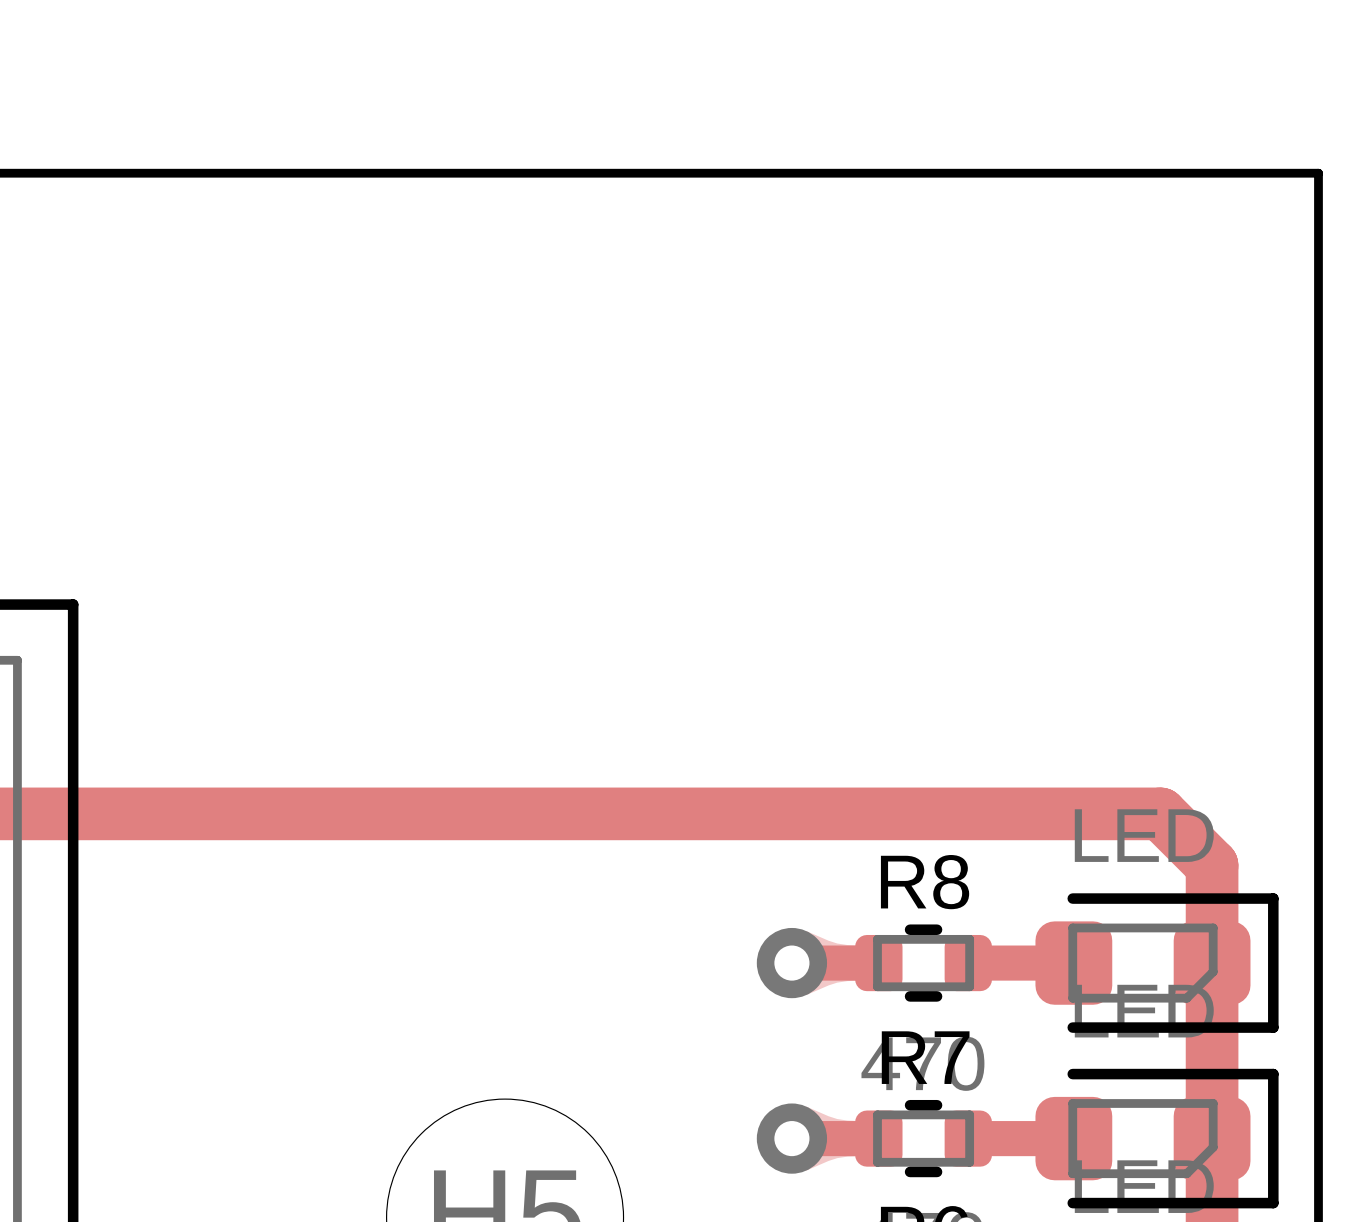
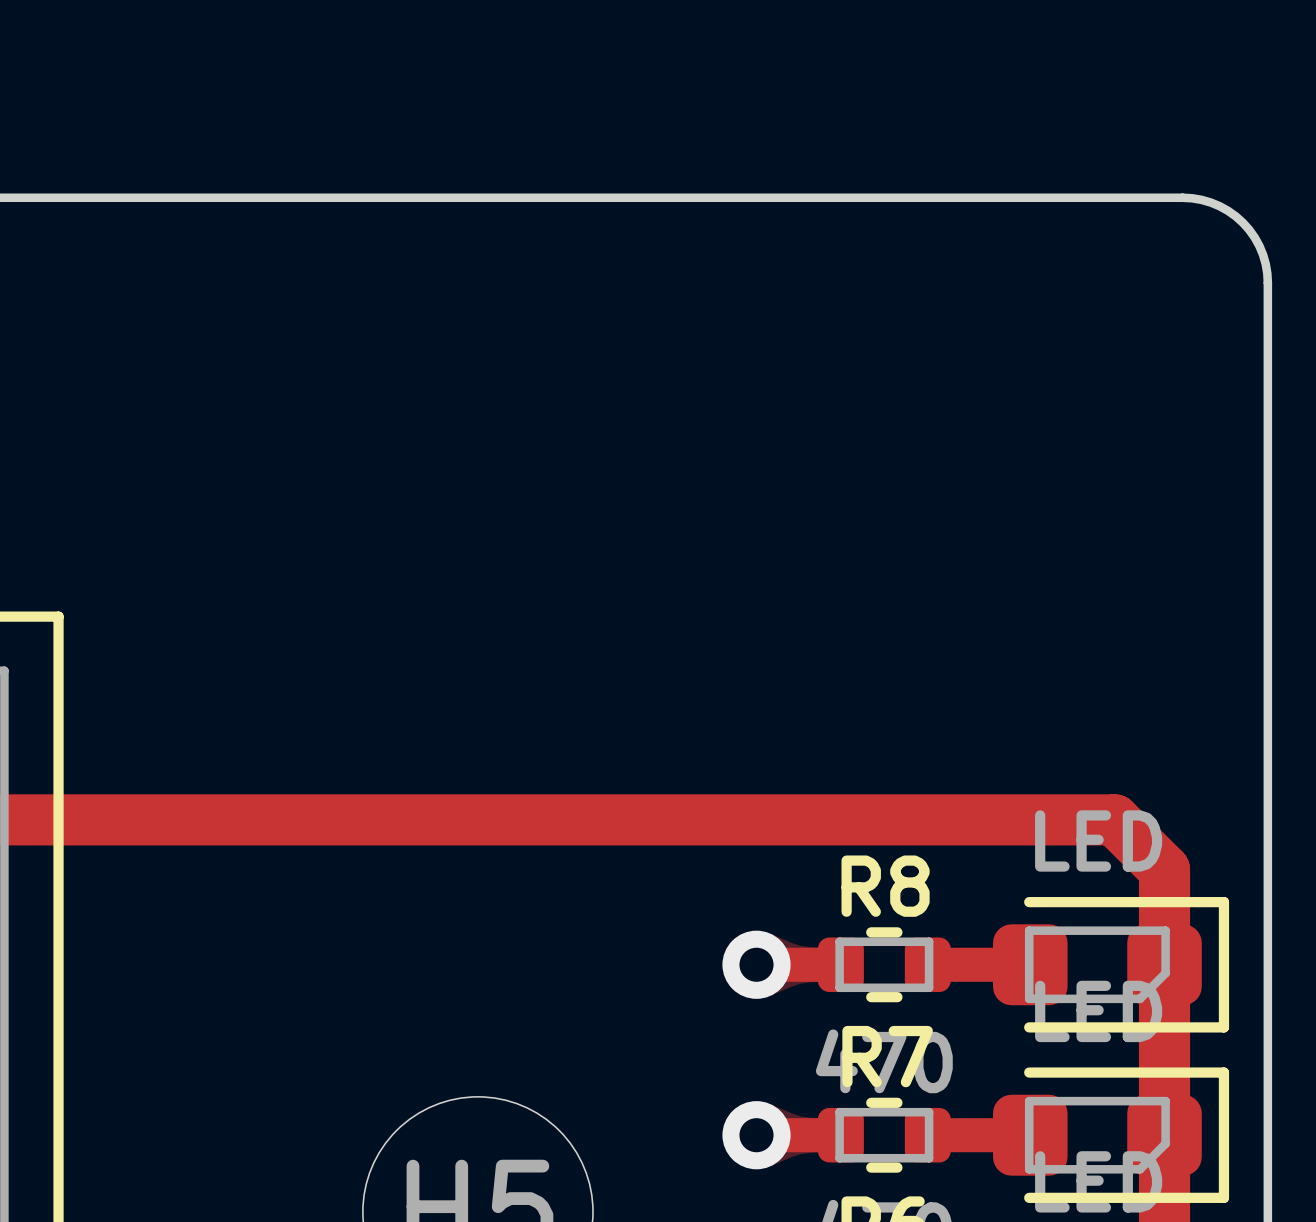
board edge: (1230, 173) (1318, 173) (1318, 260) -> (1182, 197) (1210, 202) (1227, 210) (1242, 222) (1259, 245) (1265, 264) (1267, 282)

